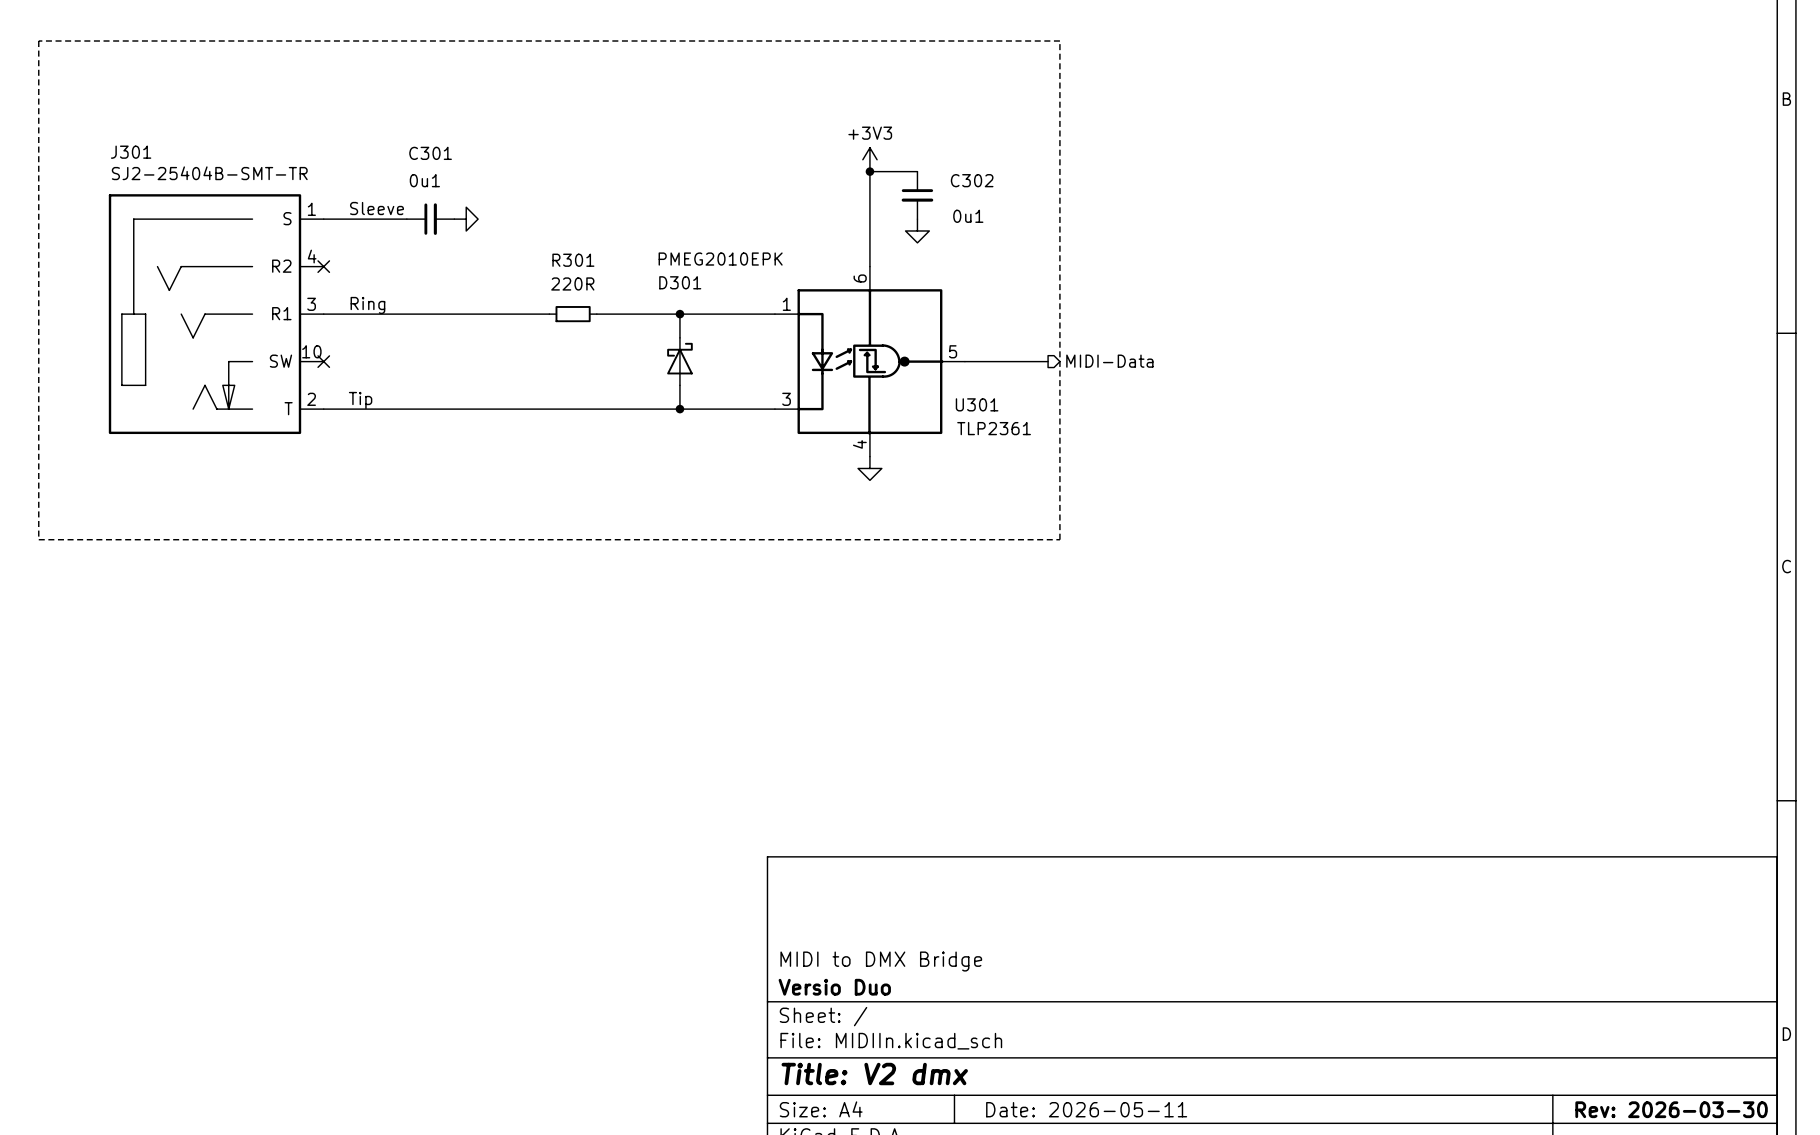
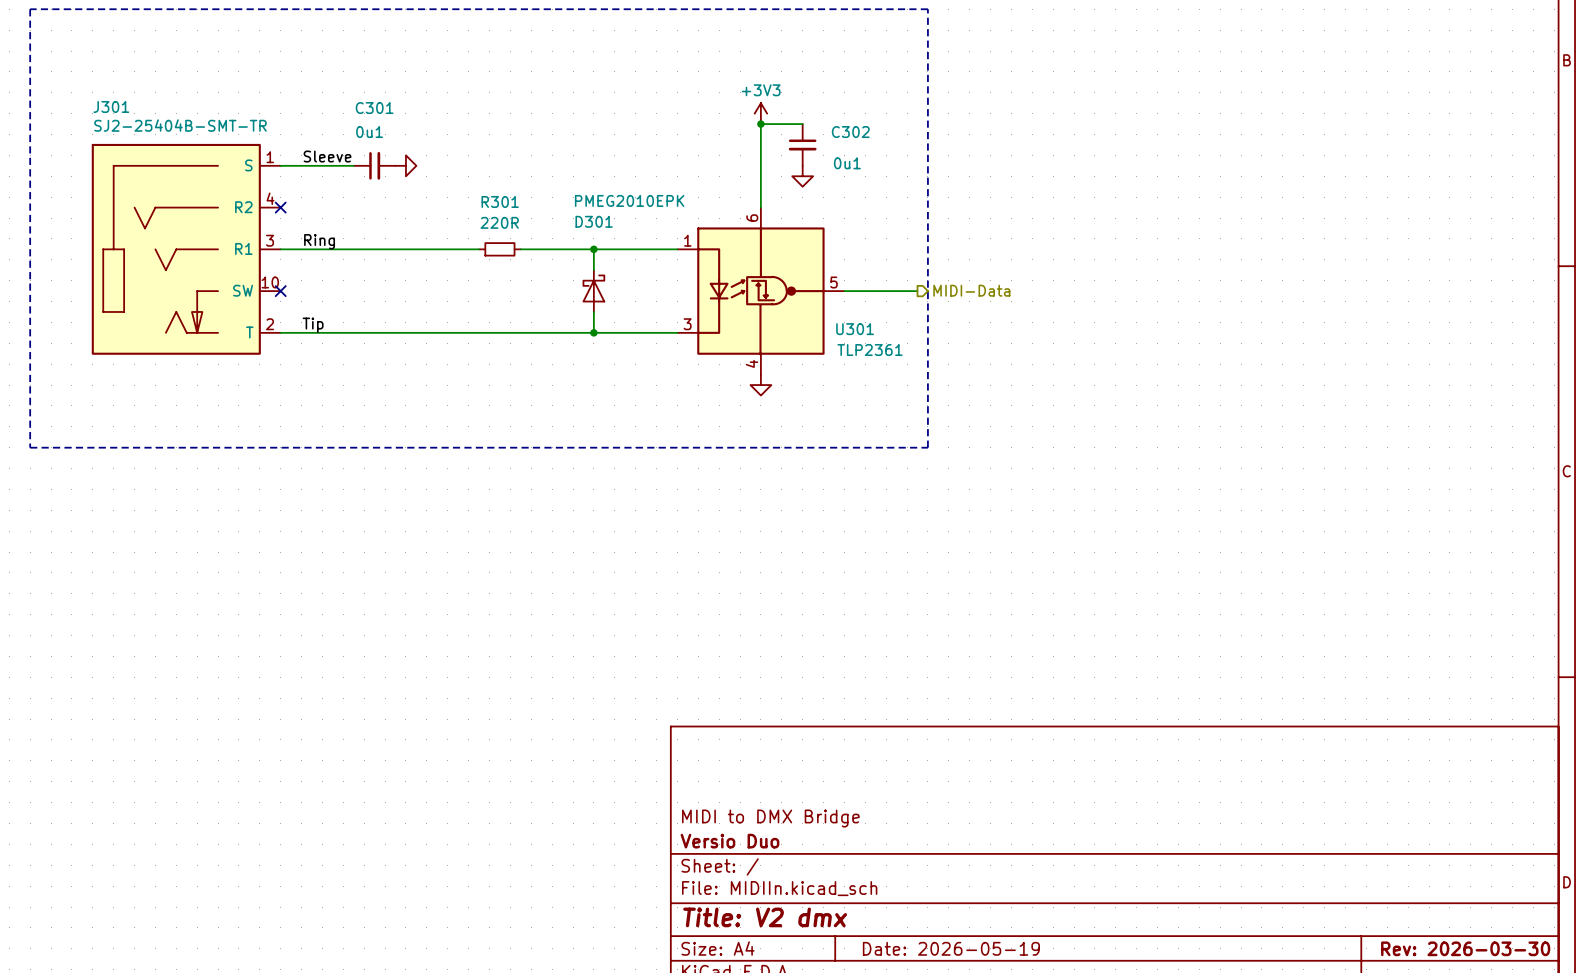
title block: Date: 2026-05-11 (1086, 1109) -> Date: 2026-05-19 (951, 948)

